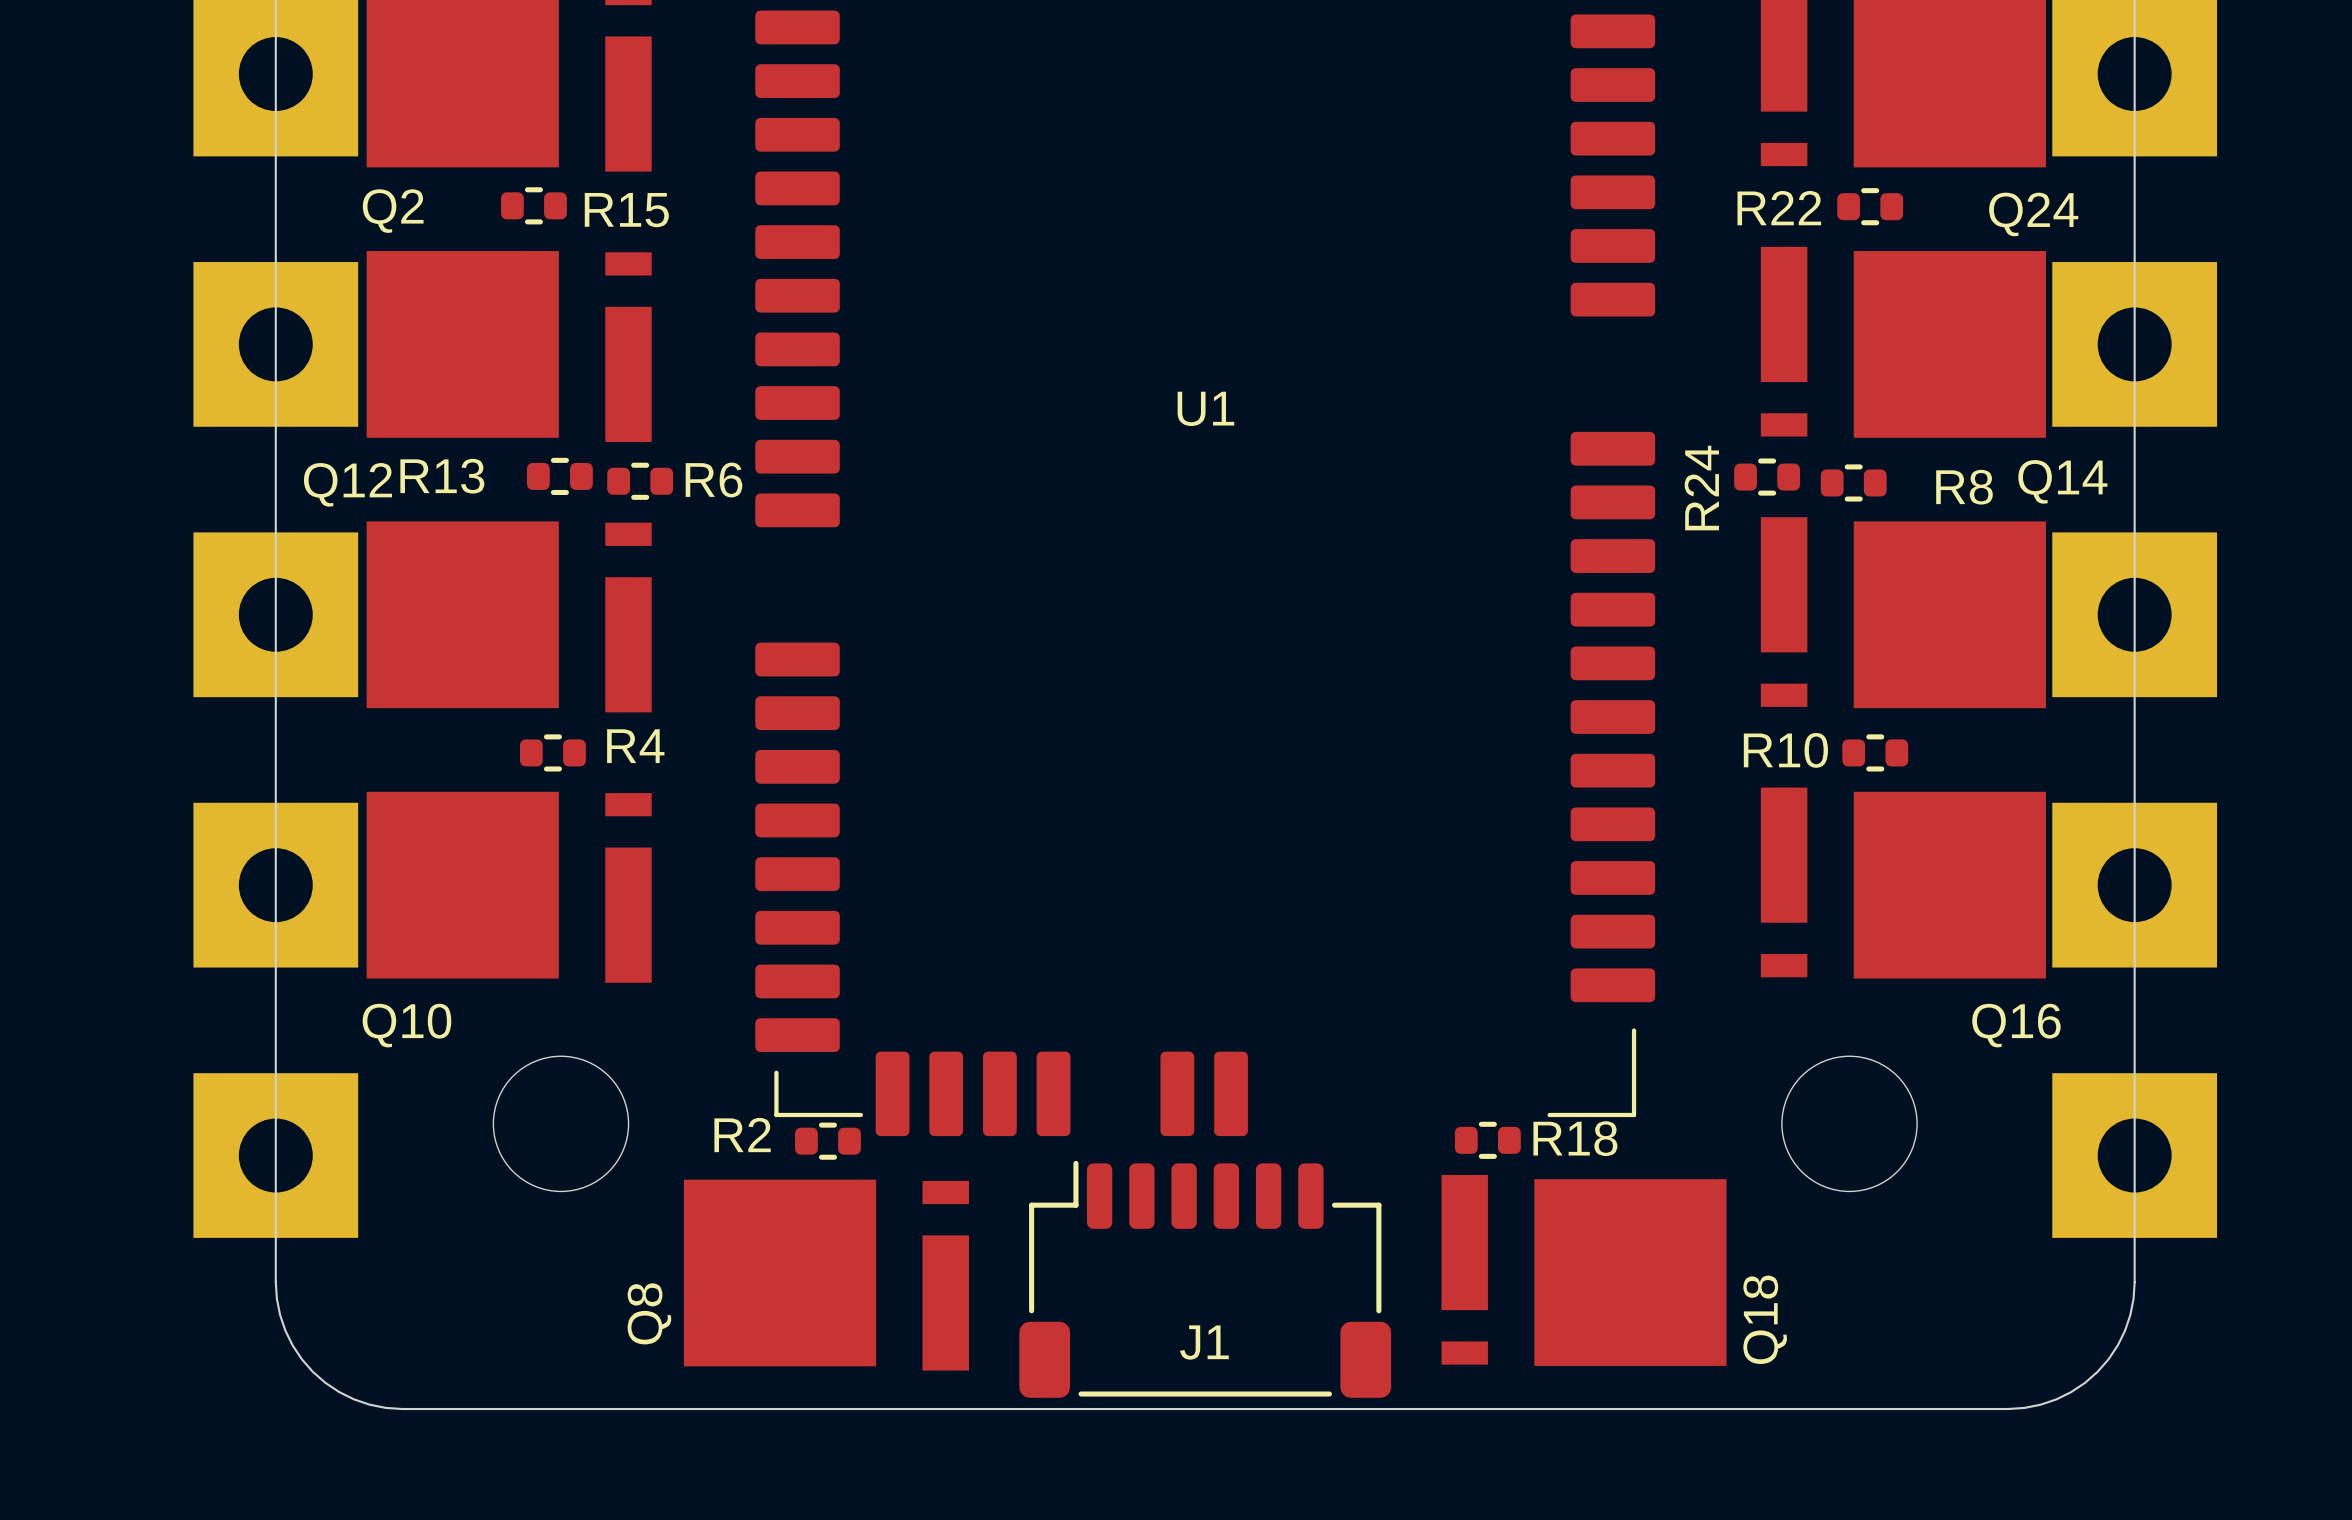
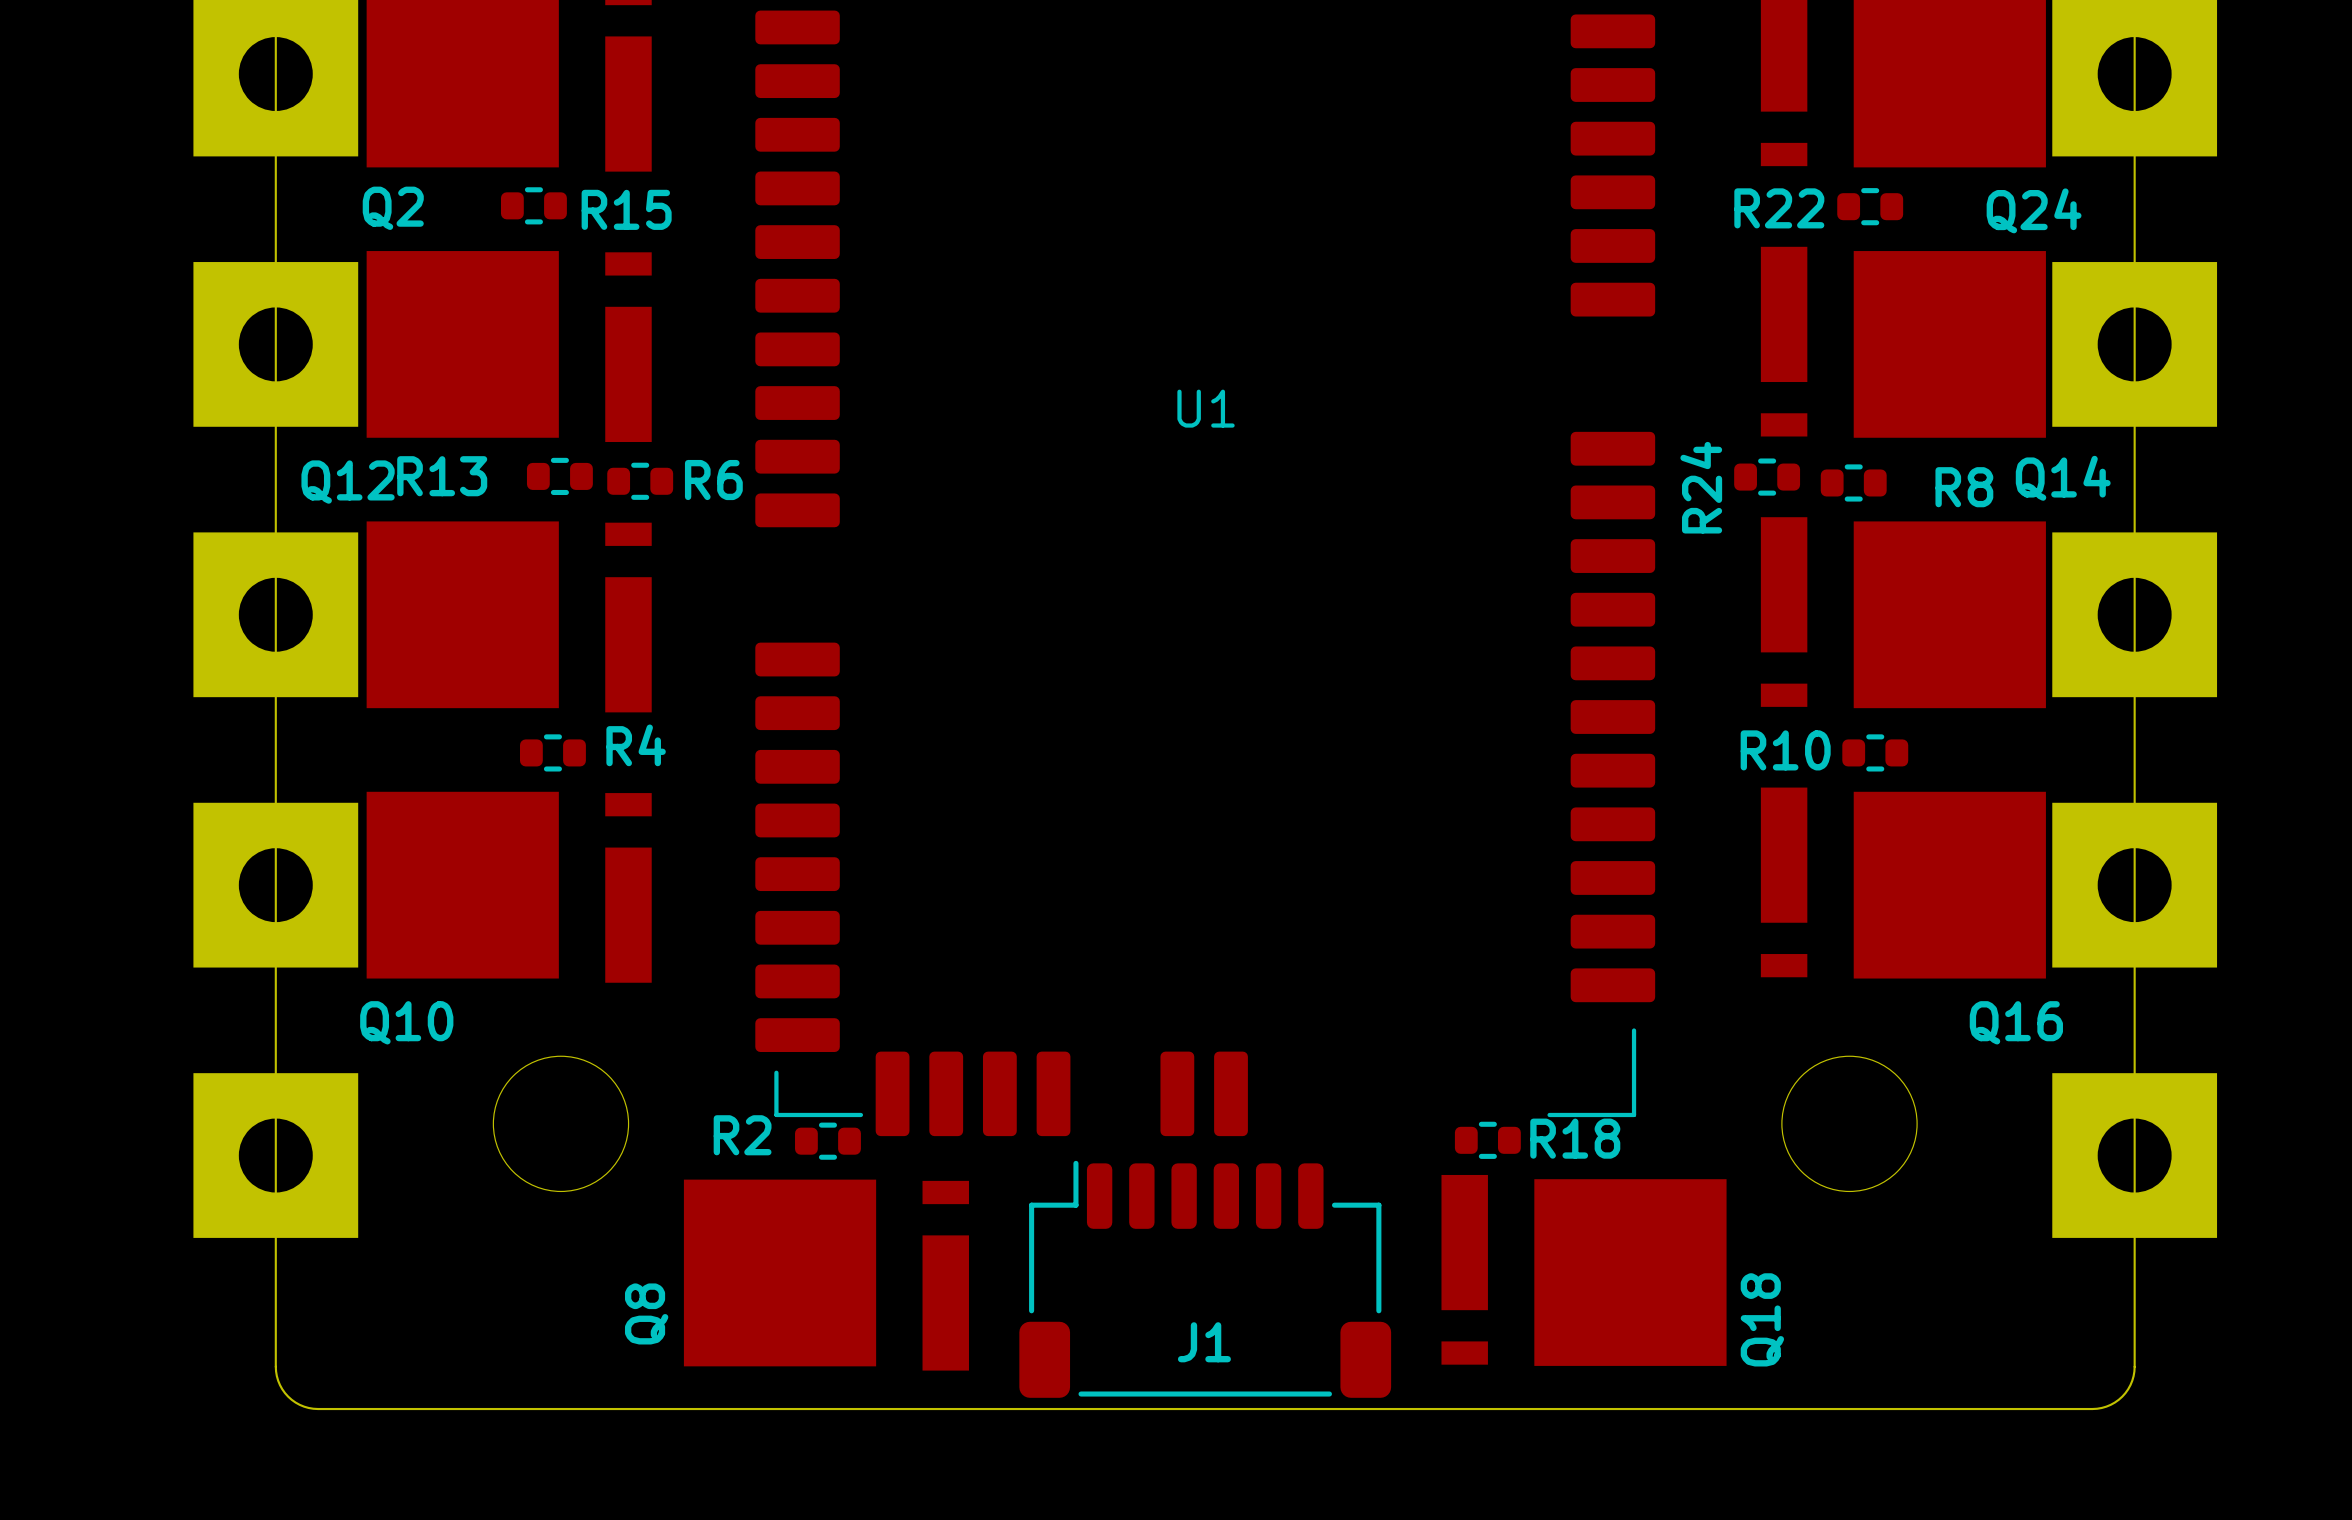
board edge: (275, 1282) (276, 1298) (285, 1330) (302, 1359) (312, 1371) (325, 1382) (354, 1399) (369, 1404) (402, 1409) -> (275, 1282) (276, 1371) (279, 1385) (288, 1396) (299, 1404) (313, 1408) (402, 1409)
board edge: (2134, 1282) (2133, 1298) (2125, 1330) (2108, 1359) (2097, 1371) (2085, 1382) (2056, 1399) (2024, 1407) (2007, 1409) -> (2134, 1282) (2134, 1371) (2130, 1385) (2122, 1396) (2110, 1404) (2097, 1408) (2007, 1409)

